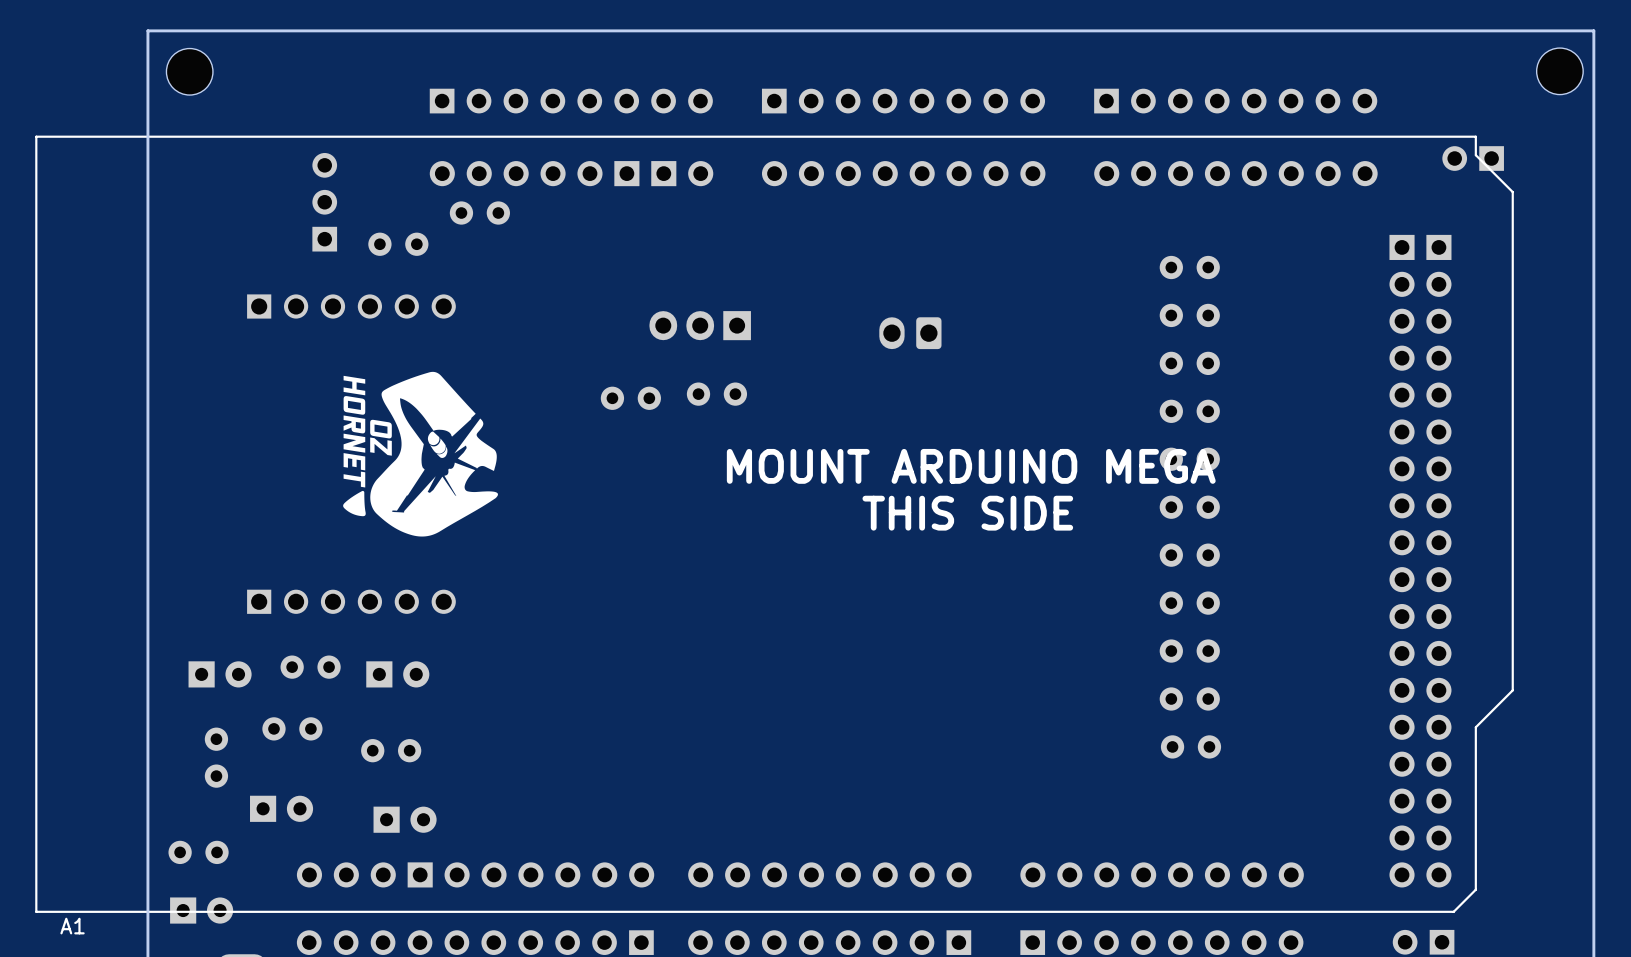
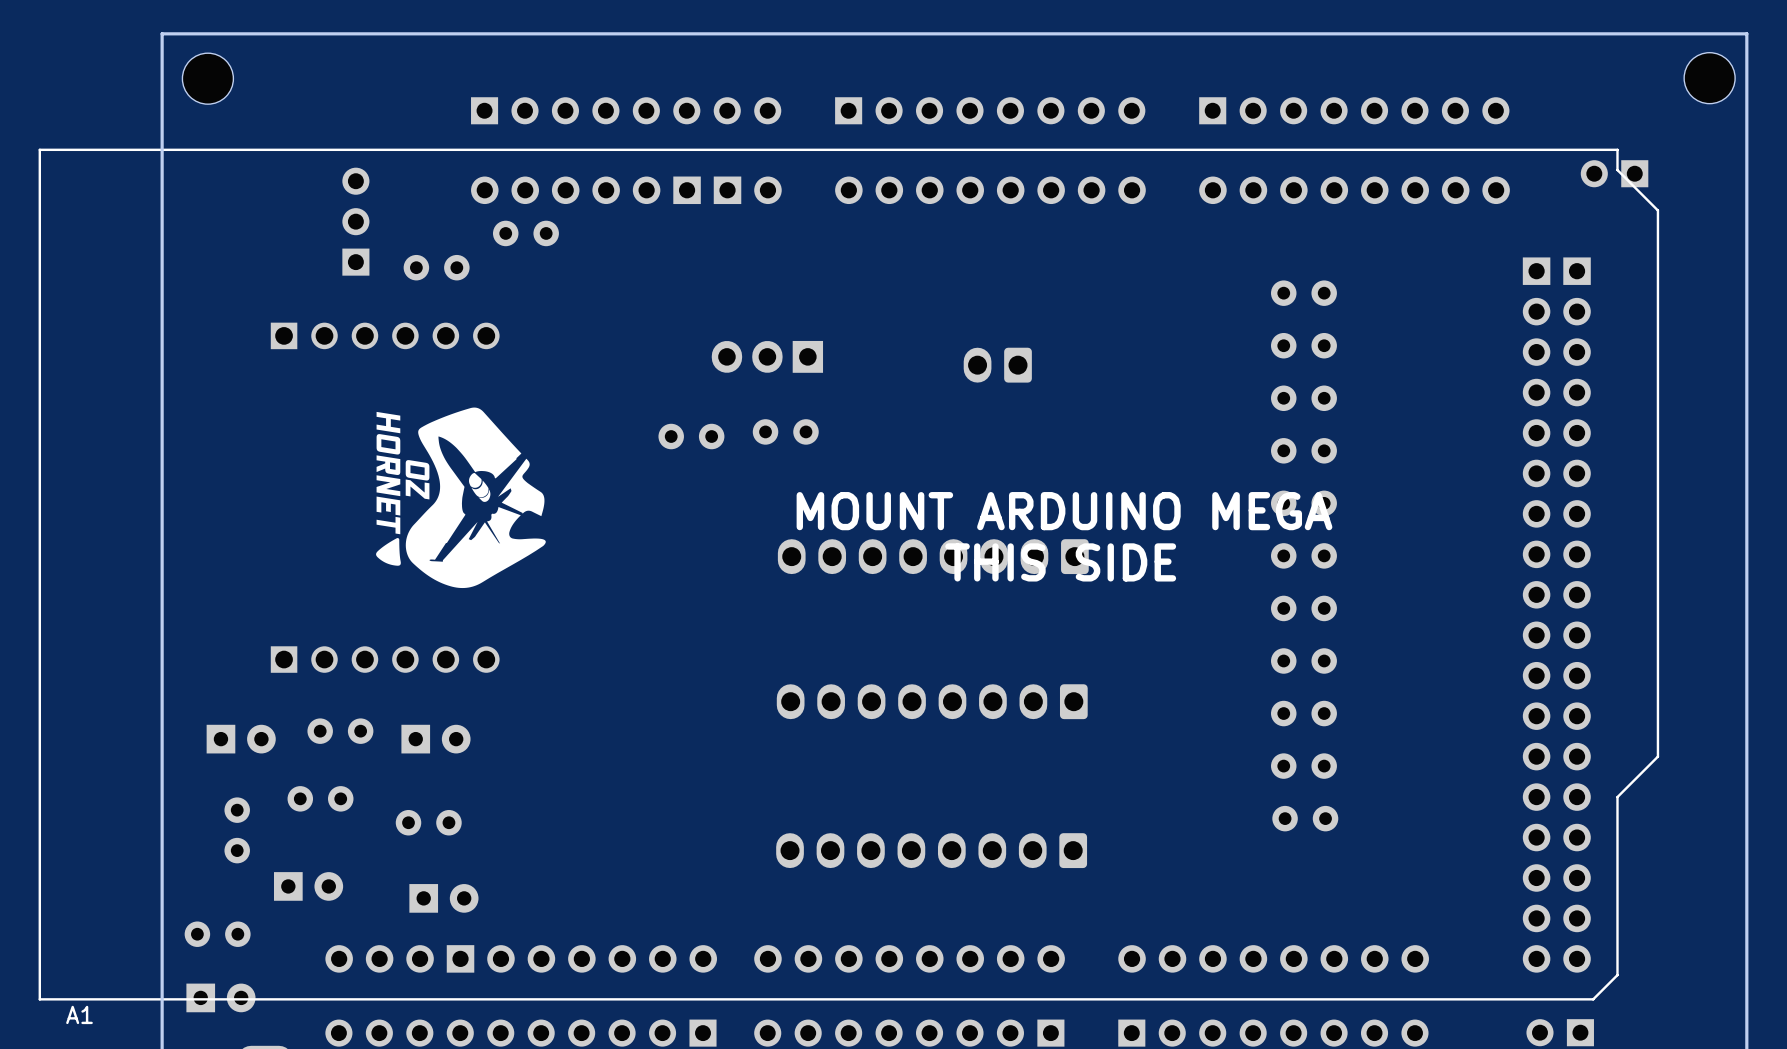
part: none -> (933, 556)
part: none -> (932, 701)
part: none -> (931, 850)

